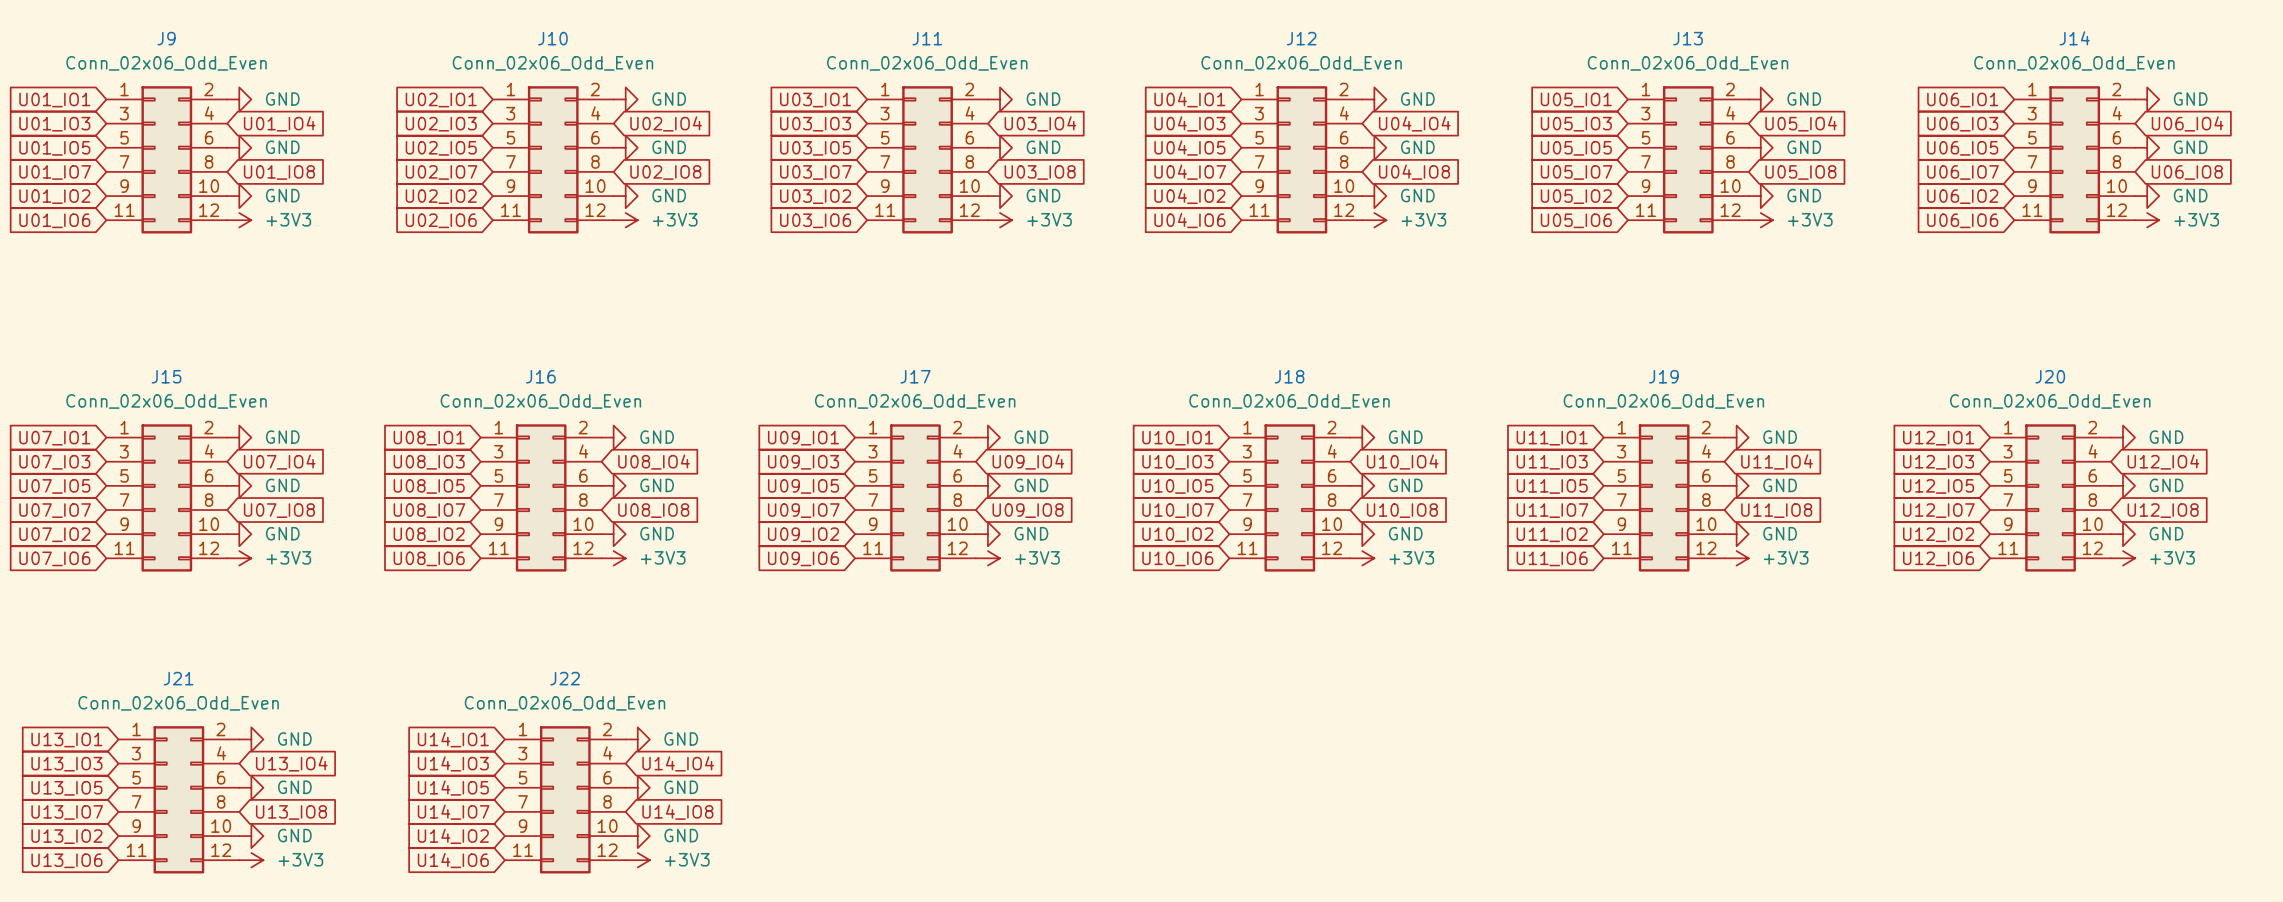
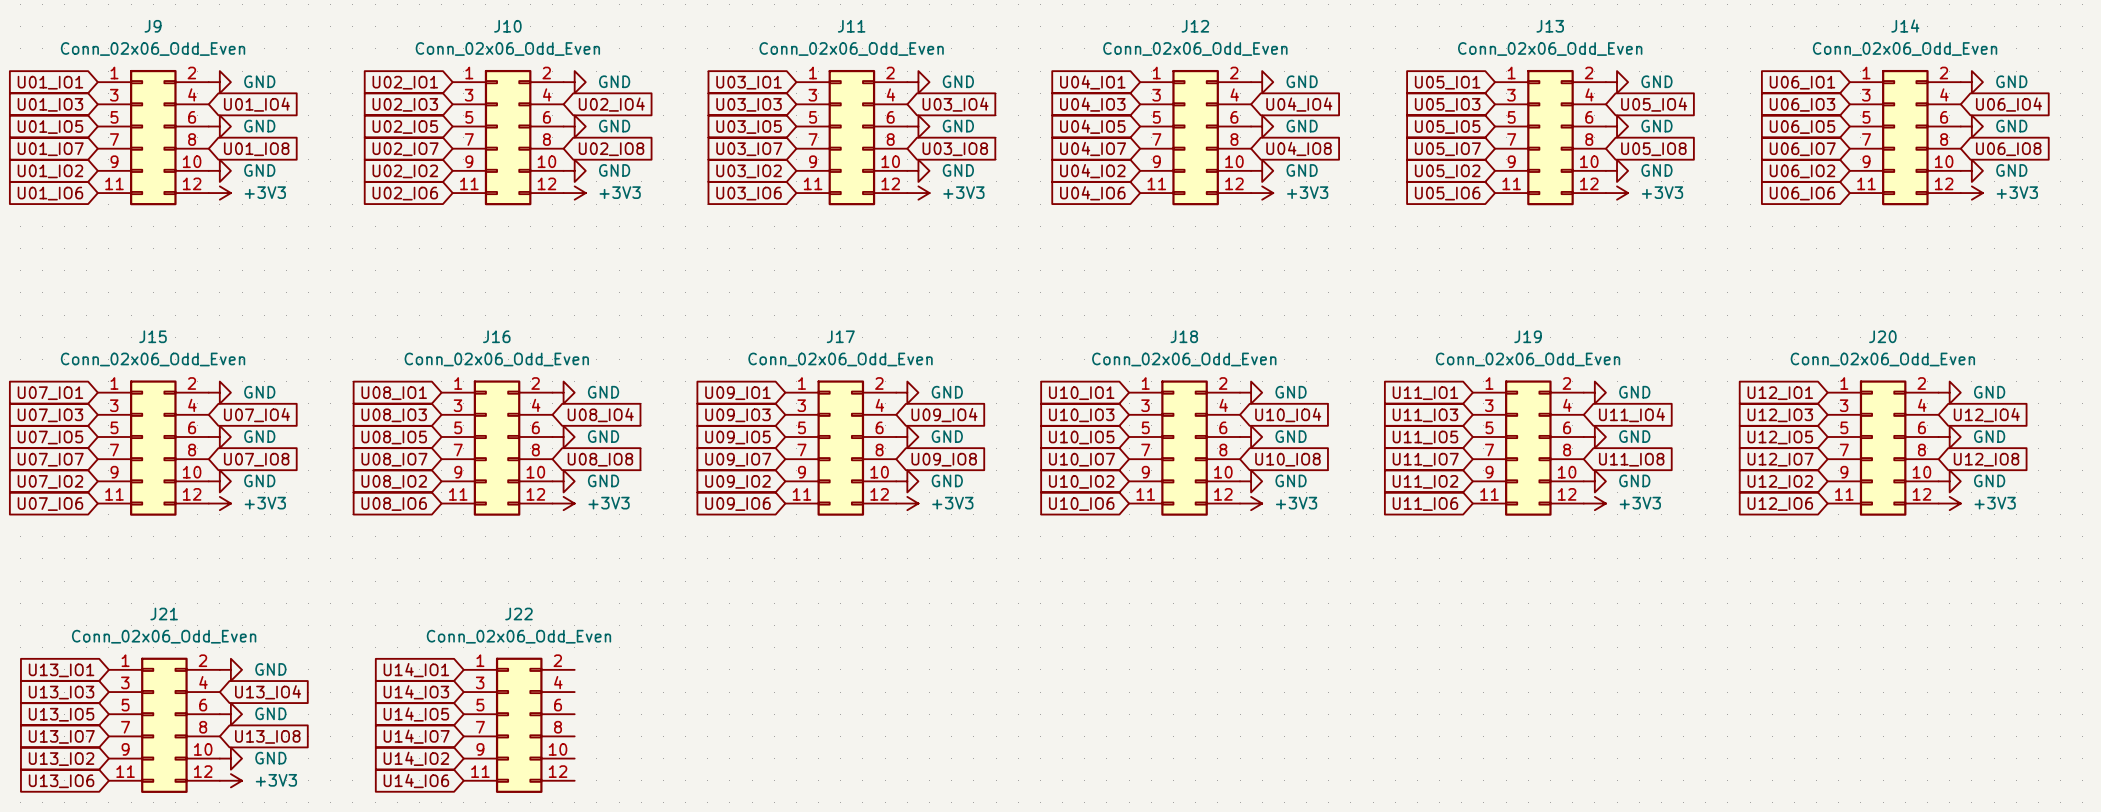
power symbol: GND (637, 739) -> none
global label: U14_IO4 (678, 763) -> none
power symbol: GND (637, 787) -> none
global label: U14_IO8 (677, 812) -> none
power symbol: GND (637, 836) -> none
power symbol: +3V3 (637, 860) -> none

